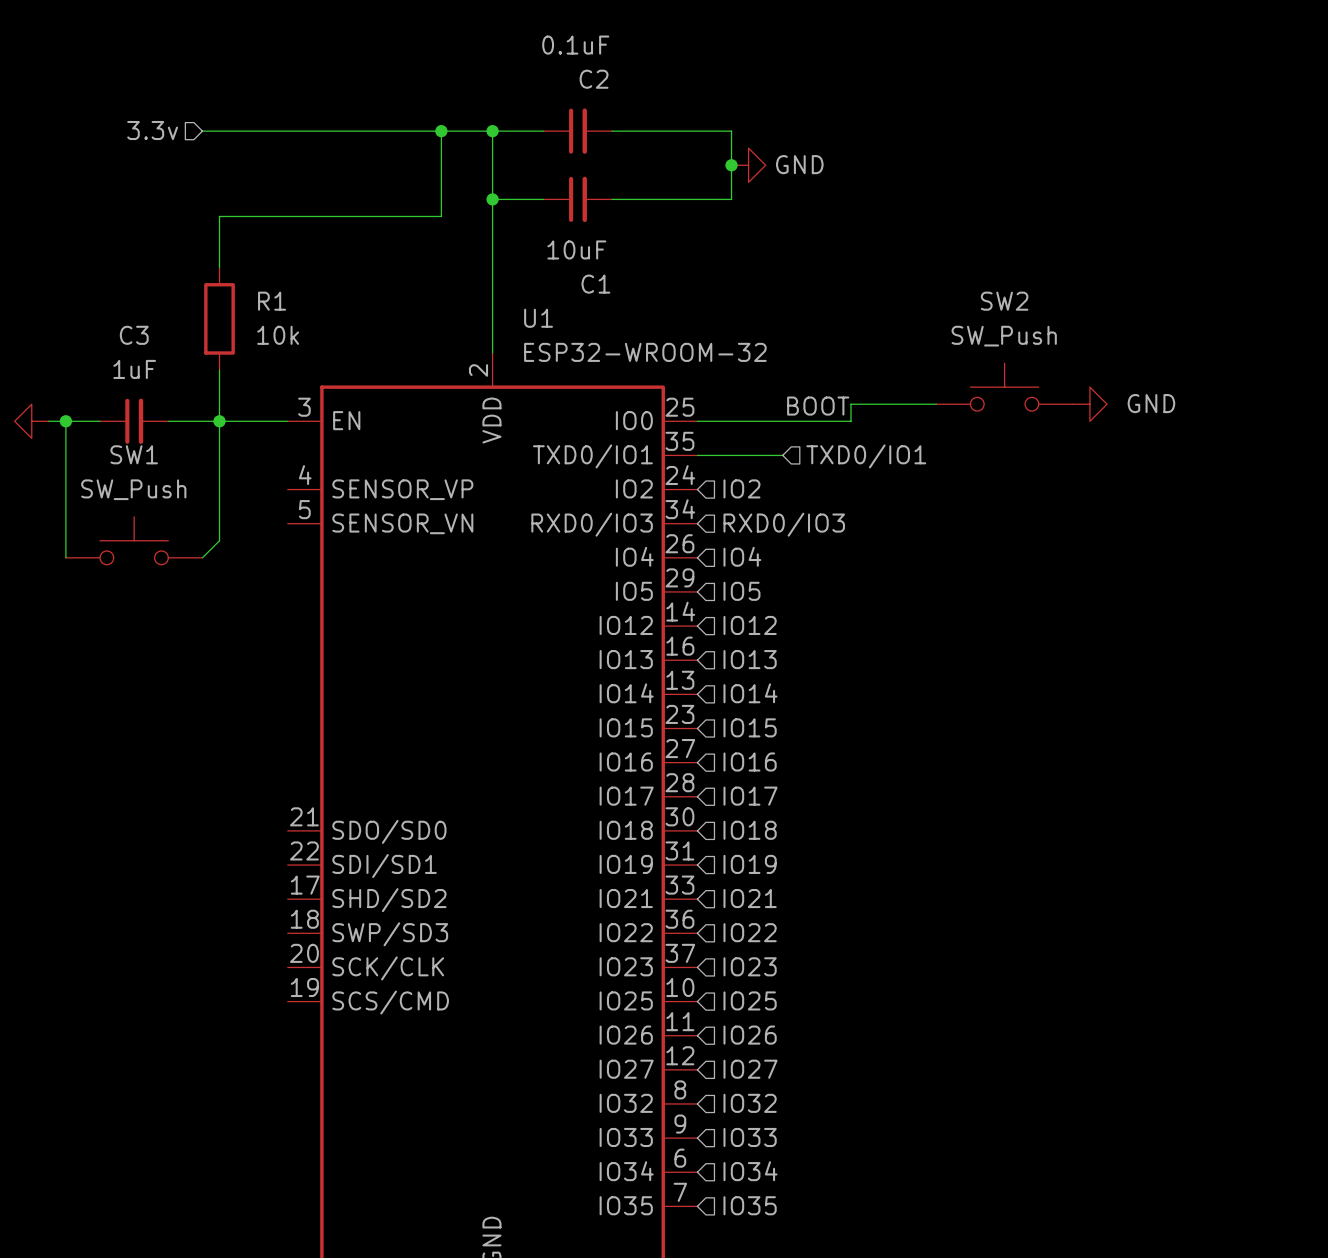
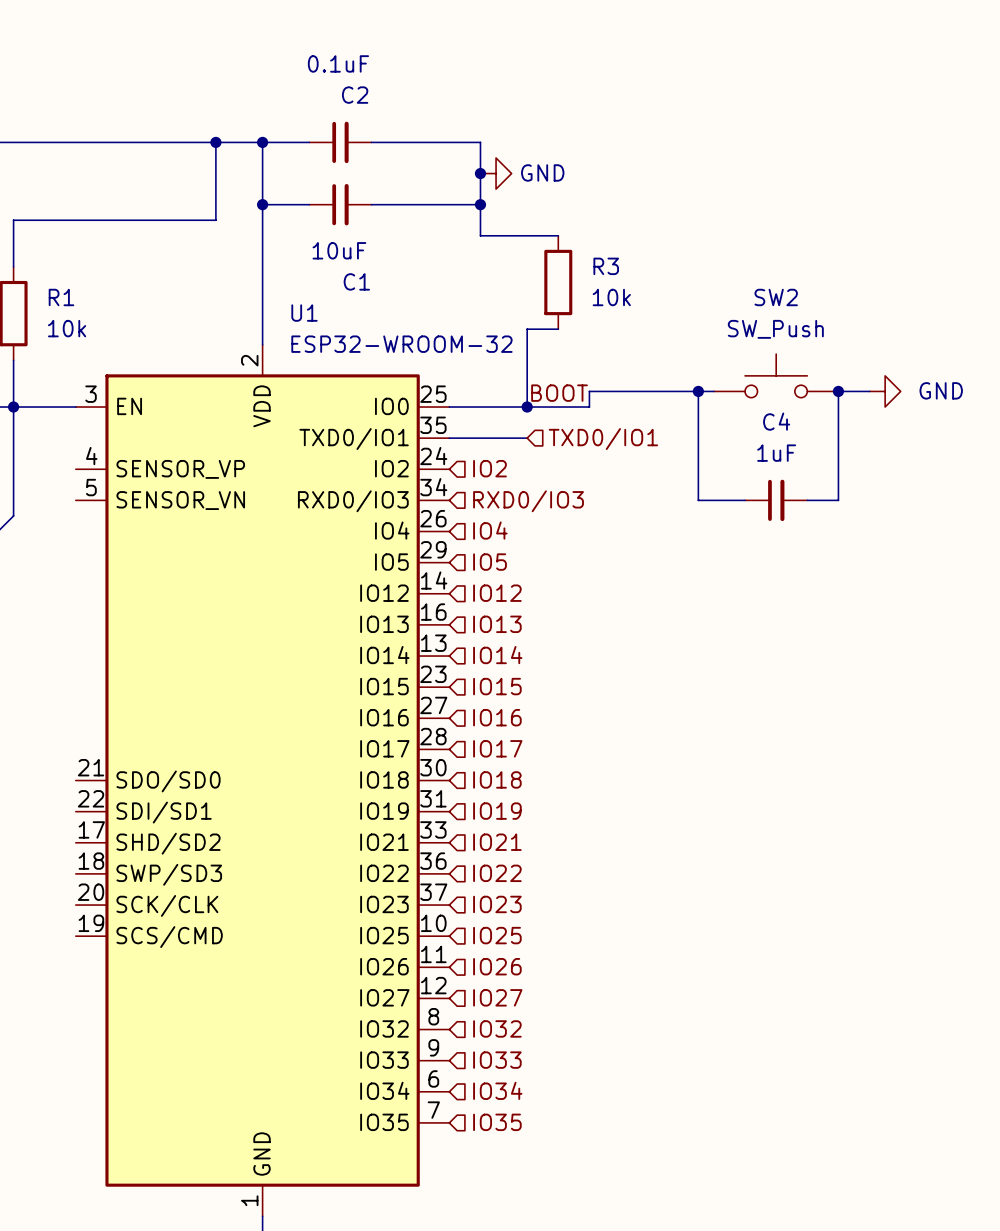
wire: none -> (480, 204) (480, 235) (558, 235)
junction: none -> (480, 204)
R3: none -> 10k (558, 282)
wire: none -> (558, 329) (527, 329) (527, 407)
SW2 position: (1004, 387) -> (776, 375)
wire: none -> (698, 391) (698, 500) (745, 500)
junction: none -> (698, 391)
power symbol position: GND (1089, 404) -> GND (885, 391)
junction: none -> (838, 391)
wire: none -> (869, 391) (838, 391) (838, 500) (807, 500)
junction: none -> (527, 407)
C4: none -> 1uF (776, 500)

